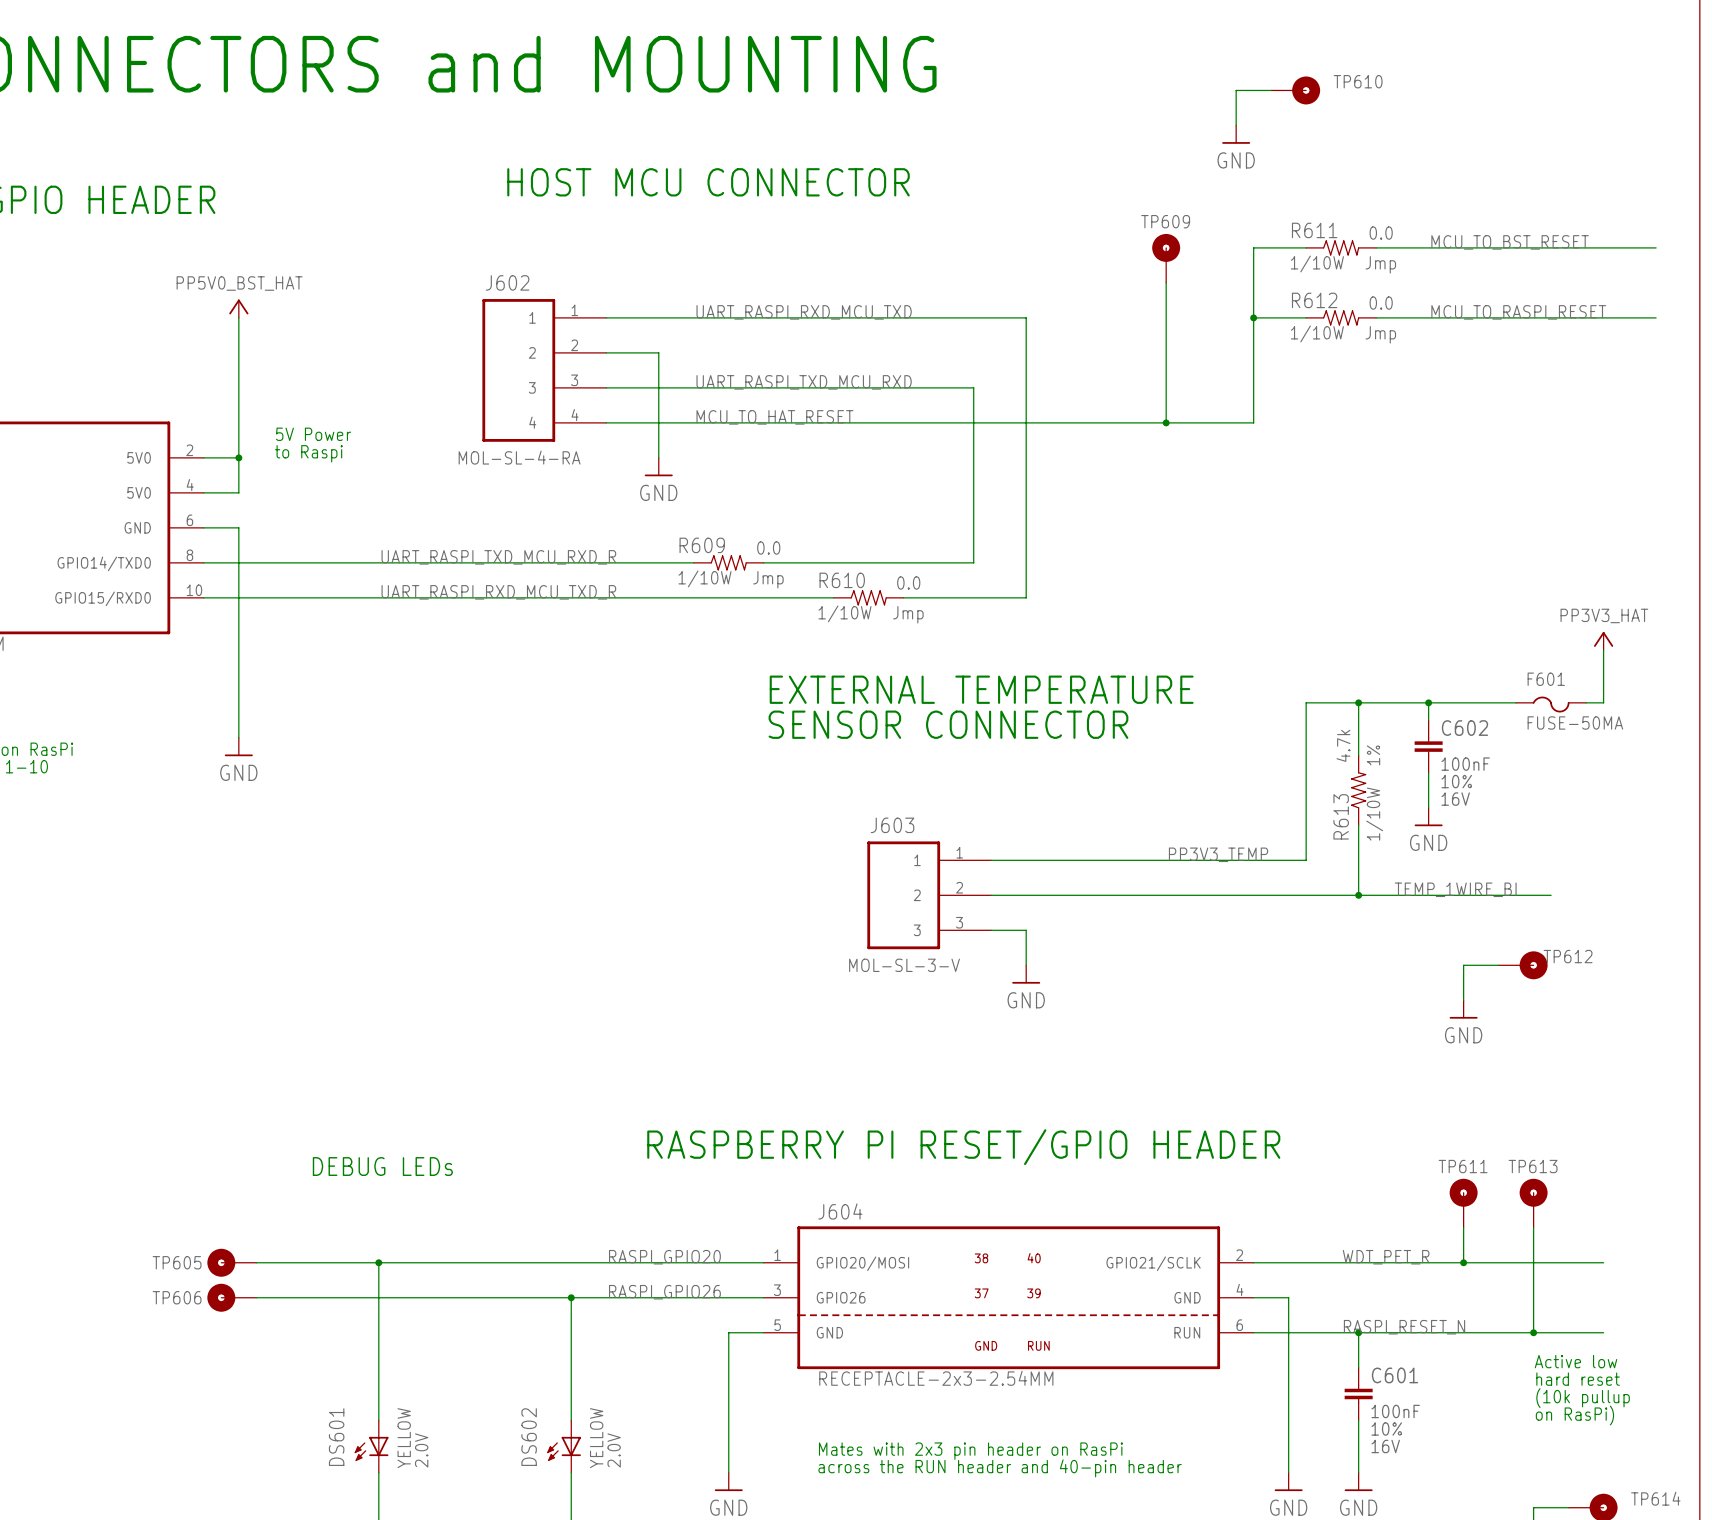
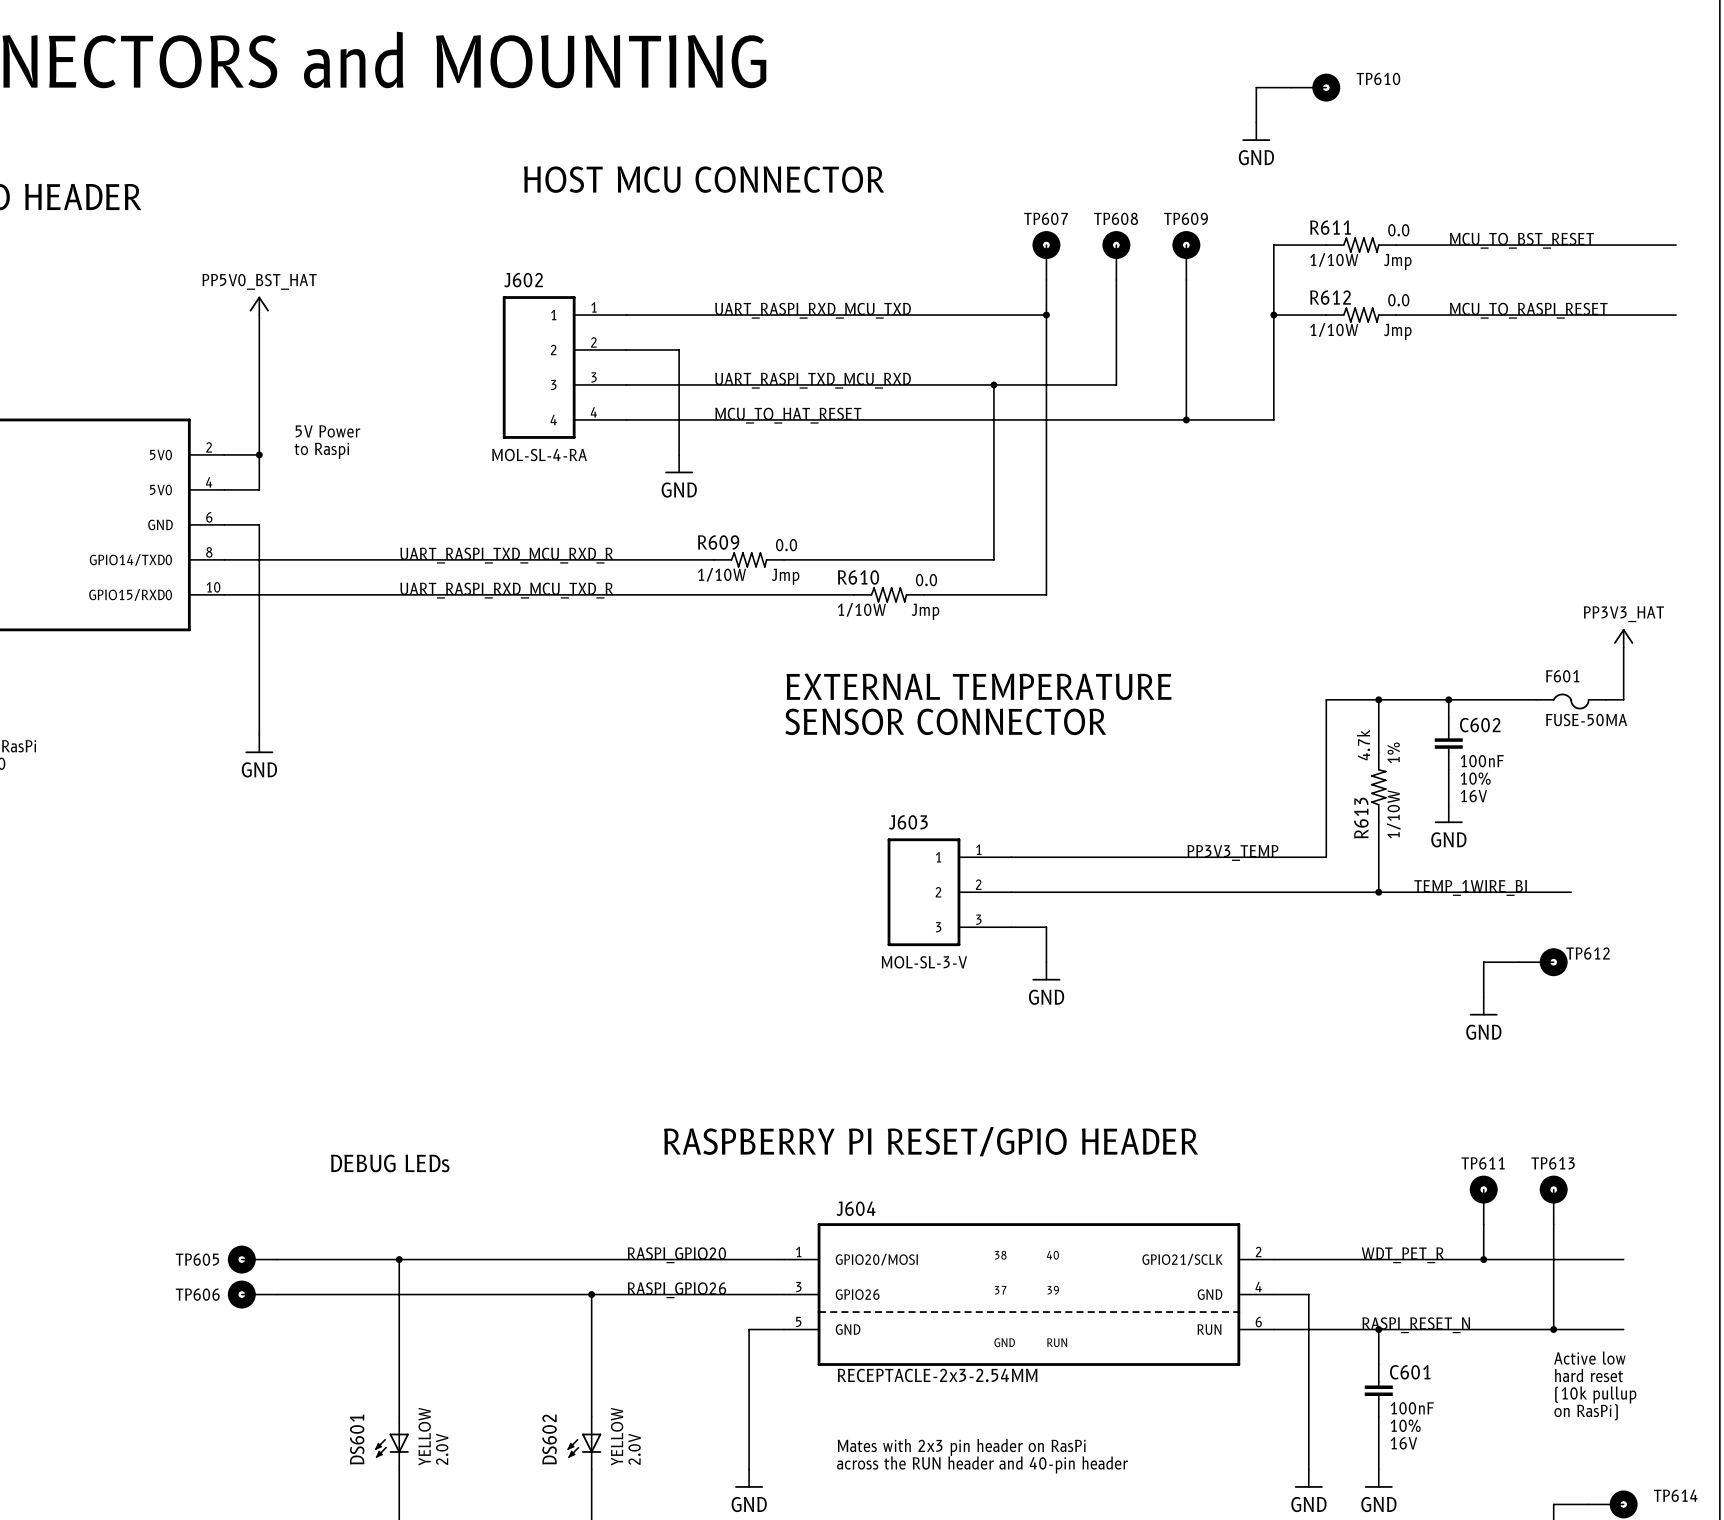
TP607: none -> (1046, 255)
TP608: none -> (1116, 255)
wire: none -> (1046, 280) (1046, 315)
wire: none -> (1116, 280) (1116, 384) (993, 384)
junction: none -> (1046, 315)
junction: none -> (993, 384)

